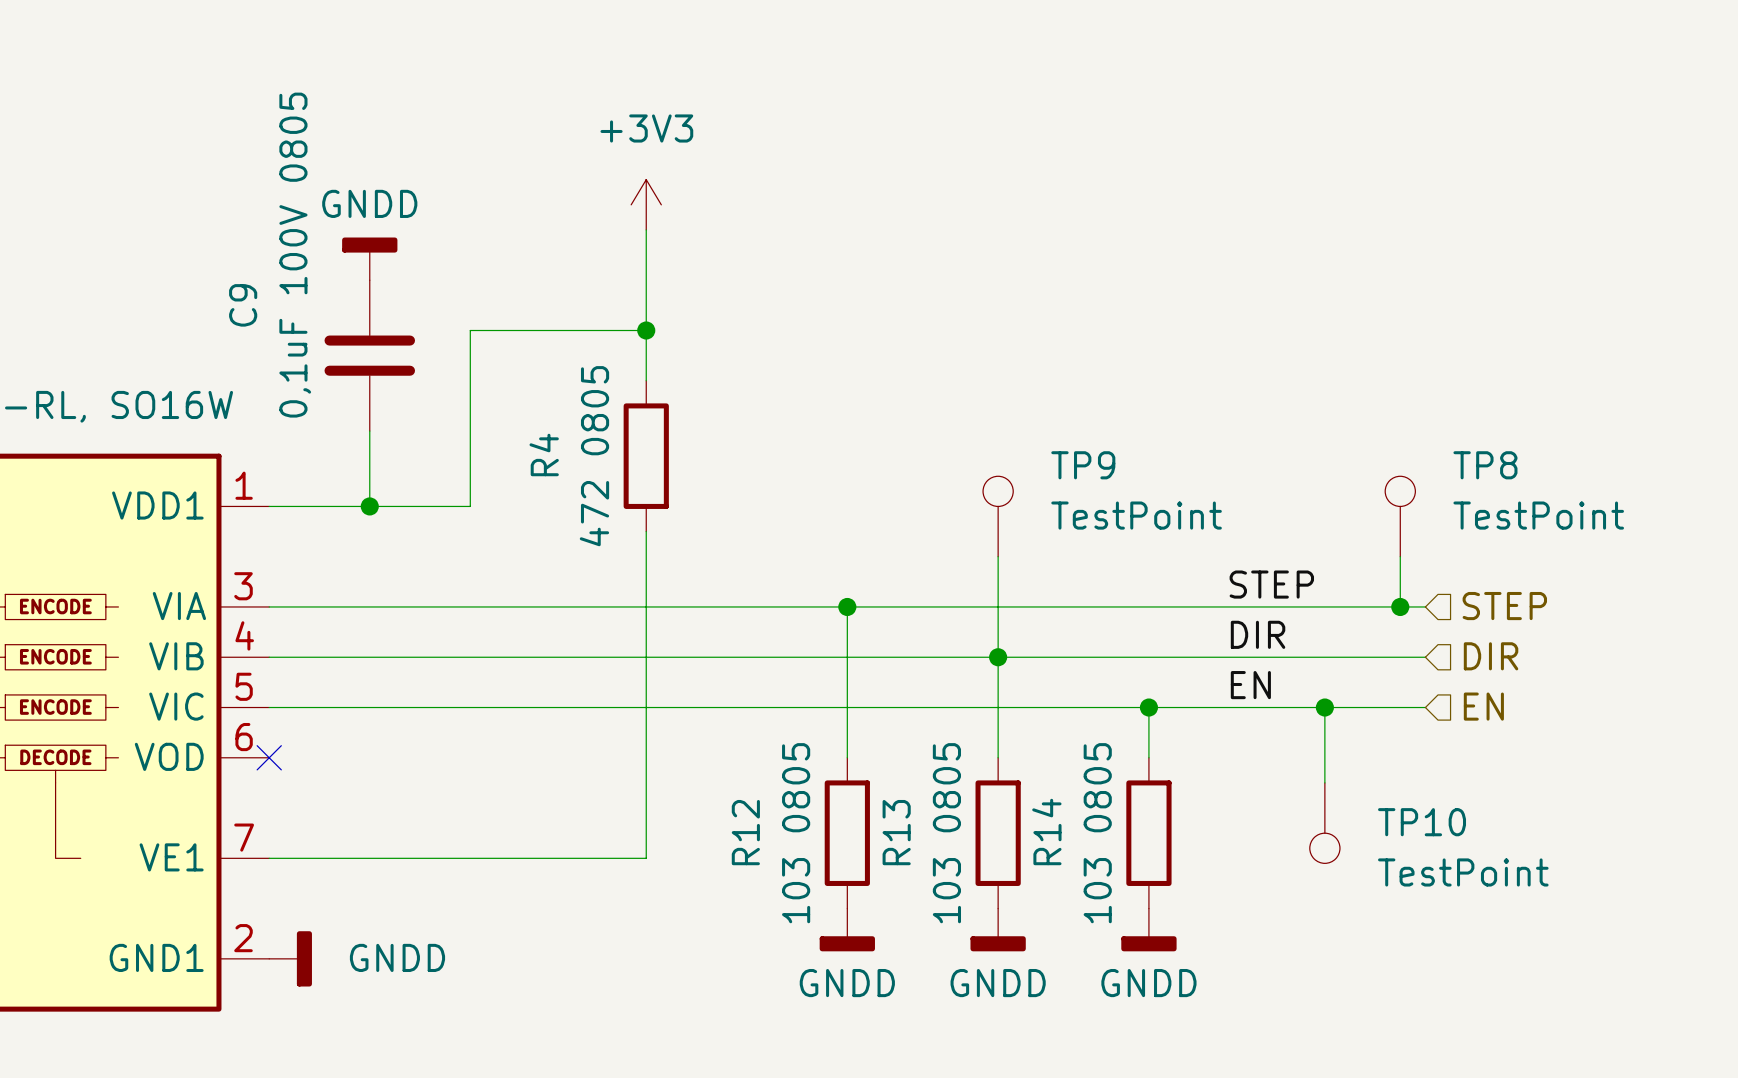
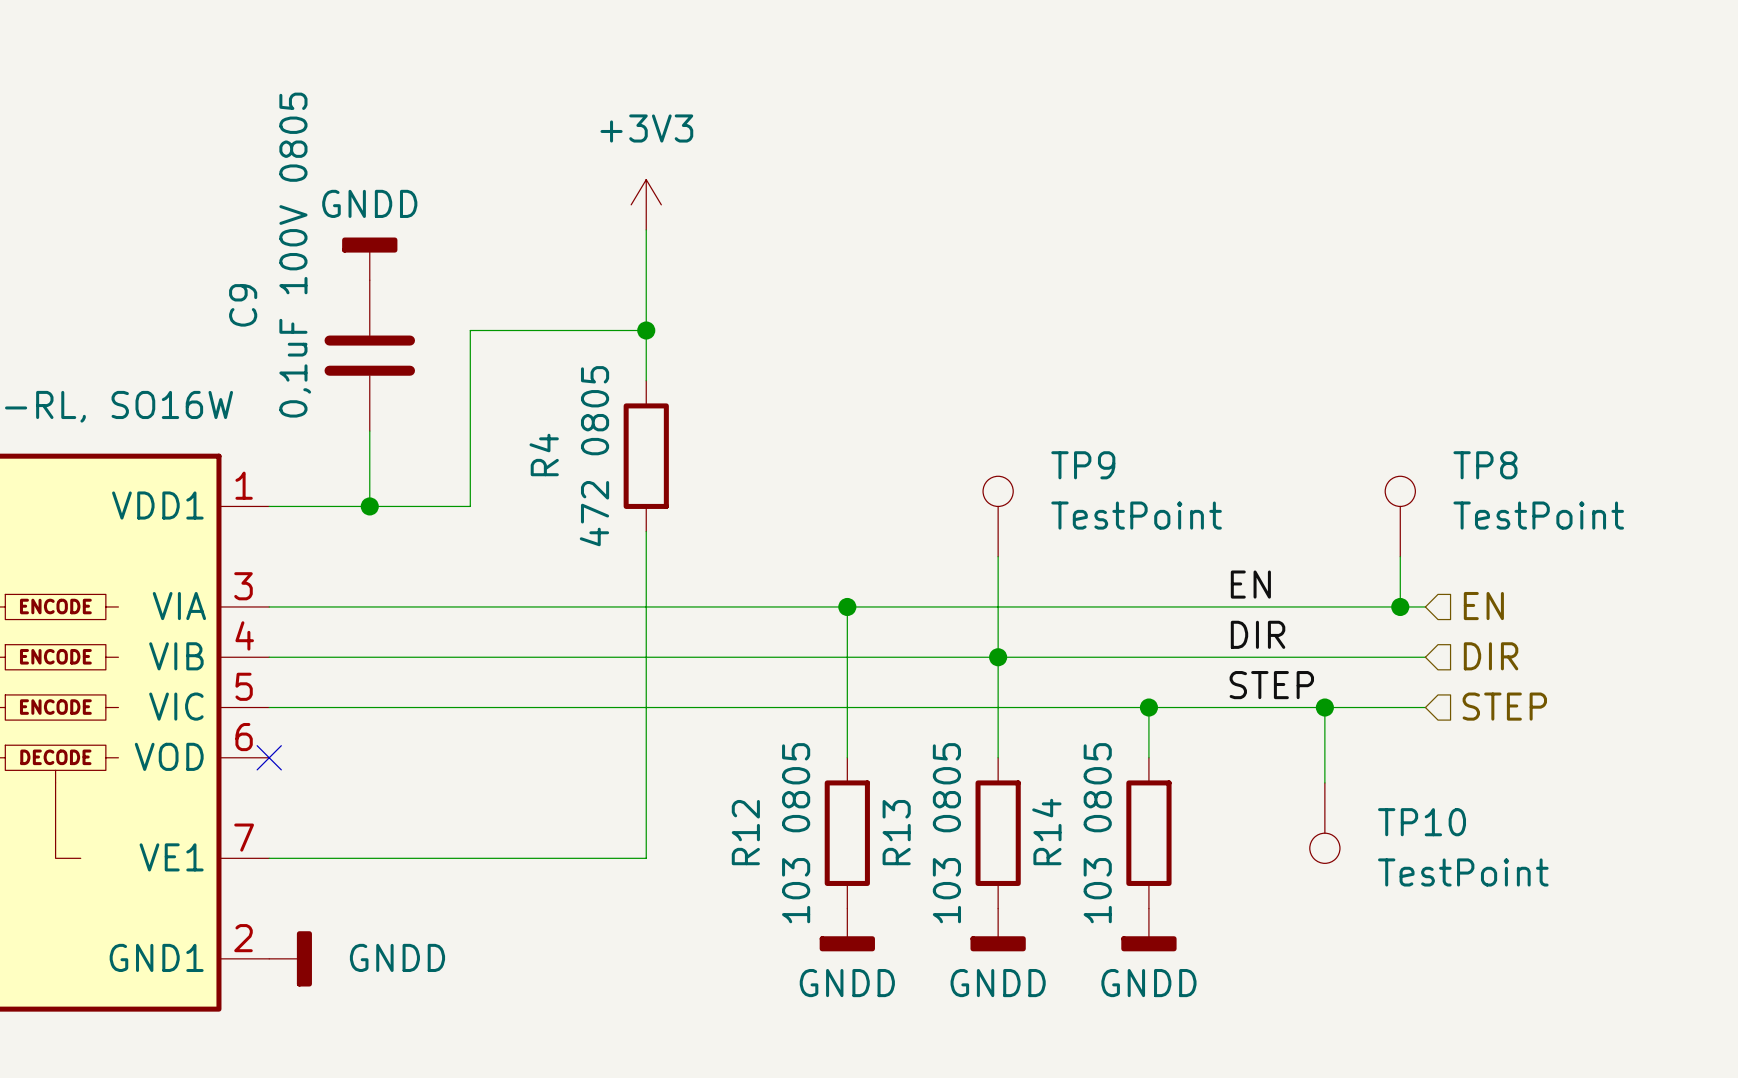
label: STEP (1271, 584) -> EN (1250, 584)
hierarchical label: STEP (1504, 606) -> EN (1483, 606)
label: EN (1250, 685) -> STEP (1271, 685)
hierarchical label: EN (1483, 706) -> STEP (1504, 706)

